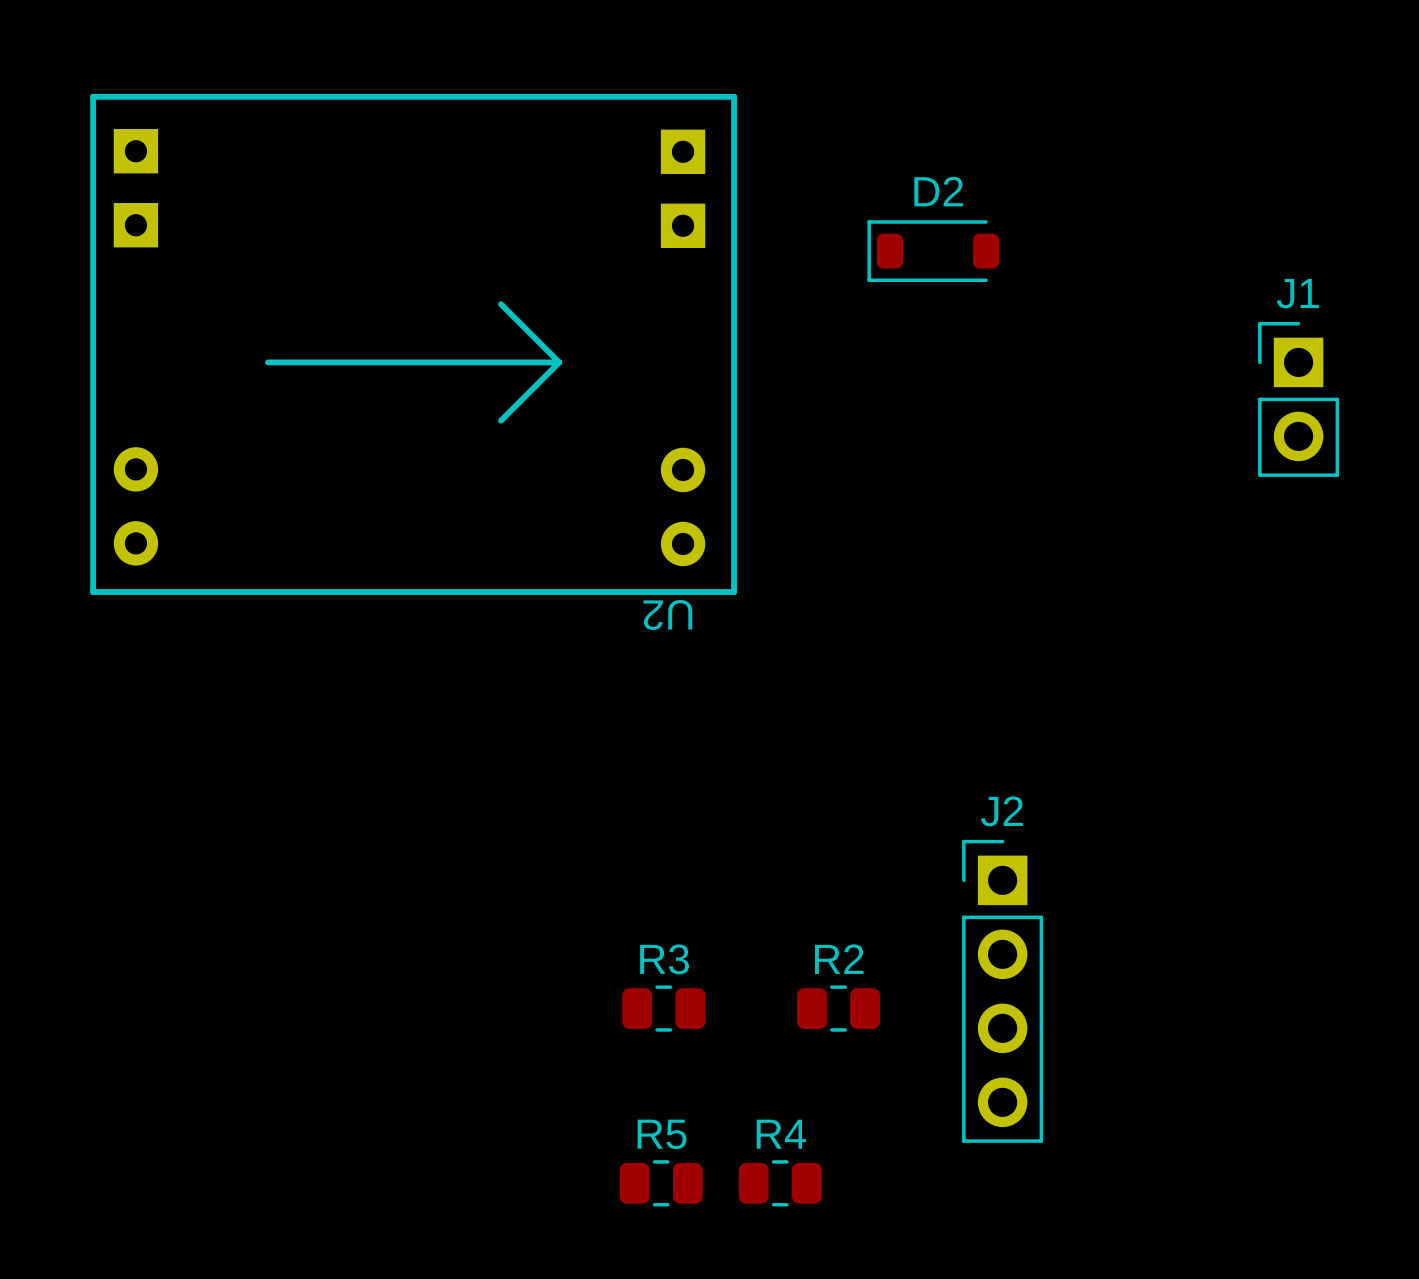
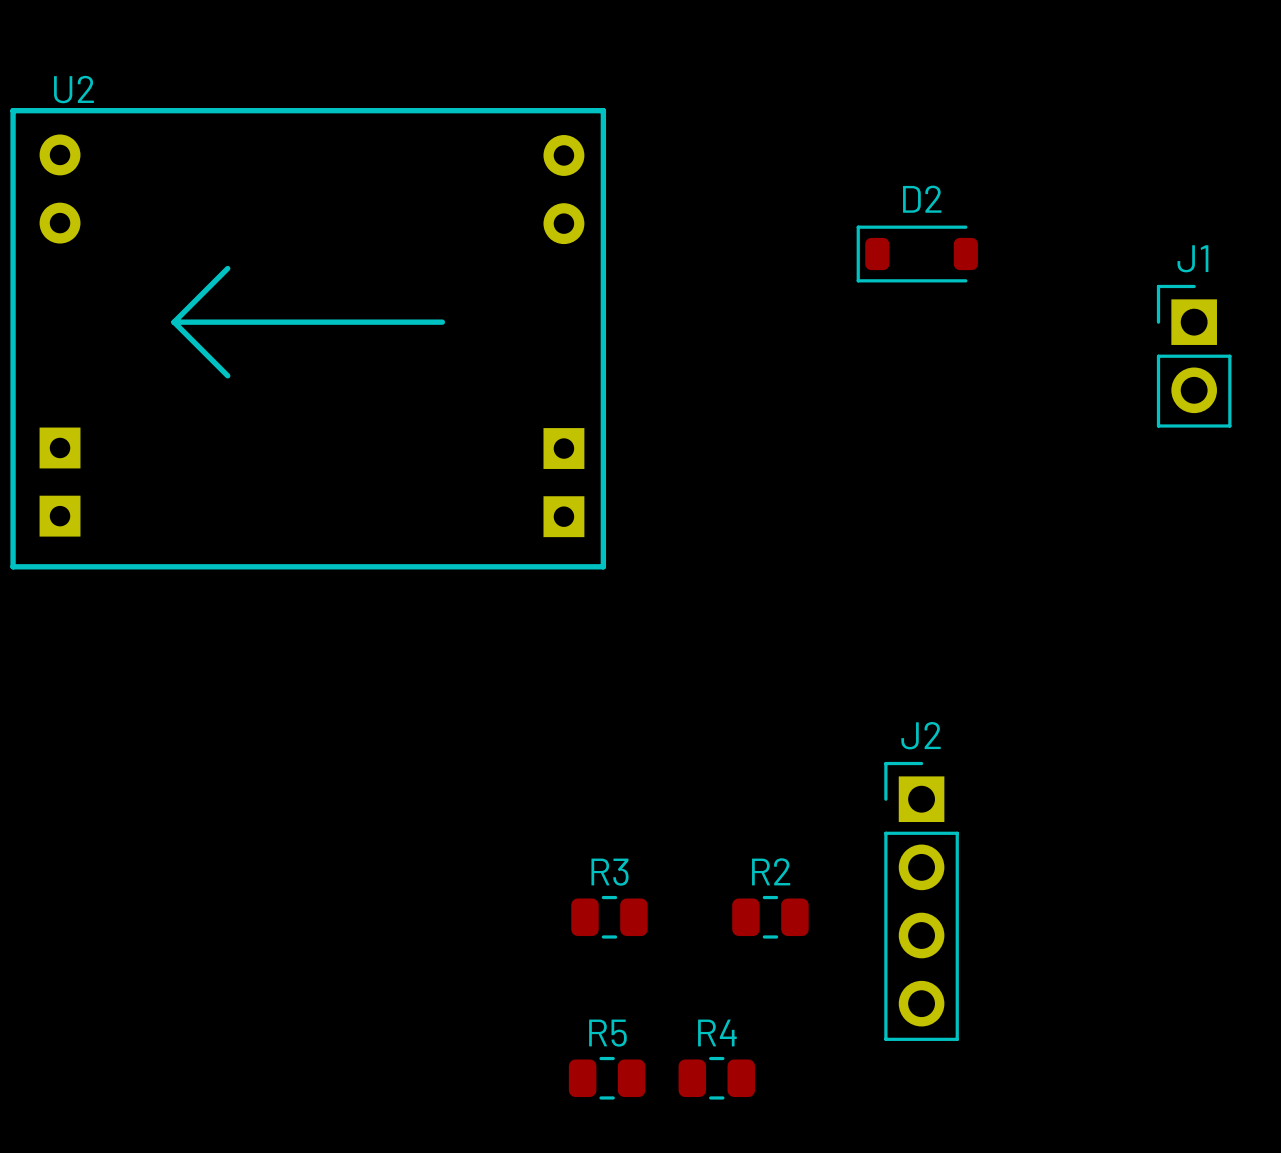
D2 position: (933, 251) -> (917, 254)
U2 rotation: 0° (413, 344) -> 180° (308, 338)

